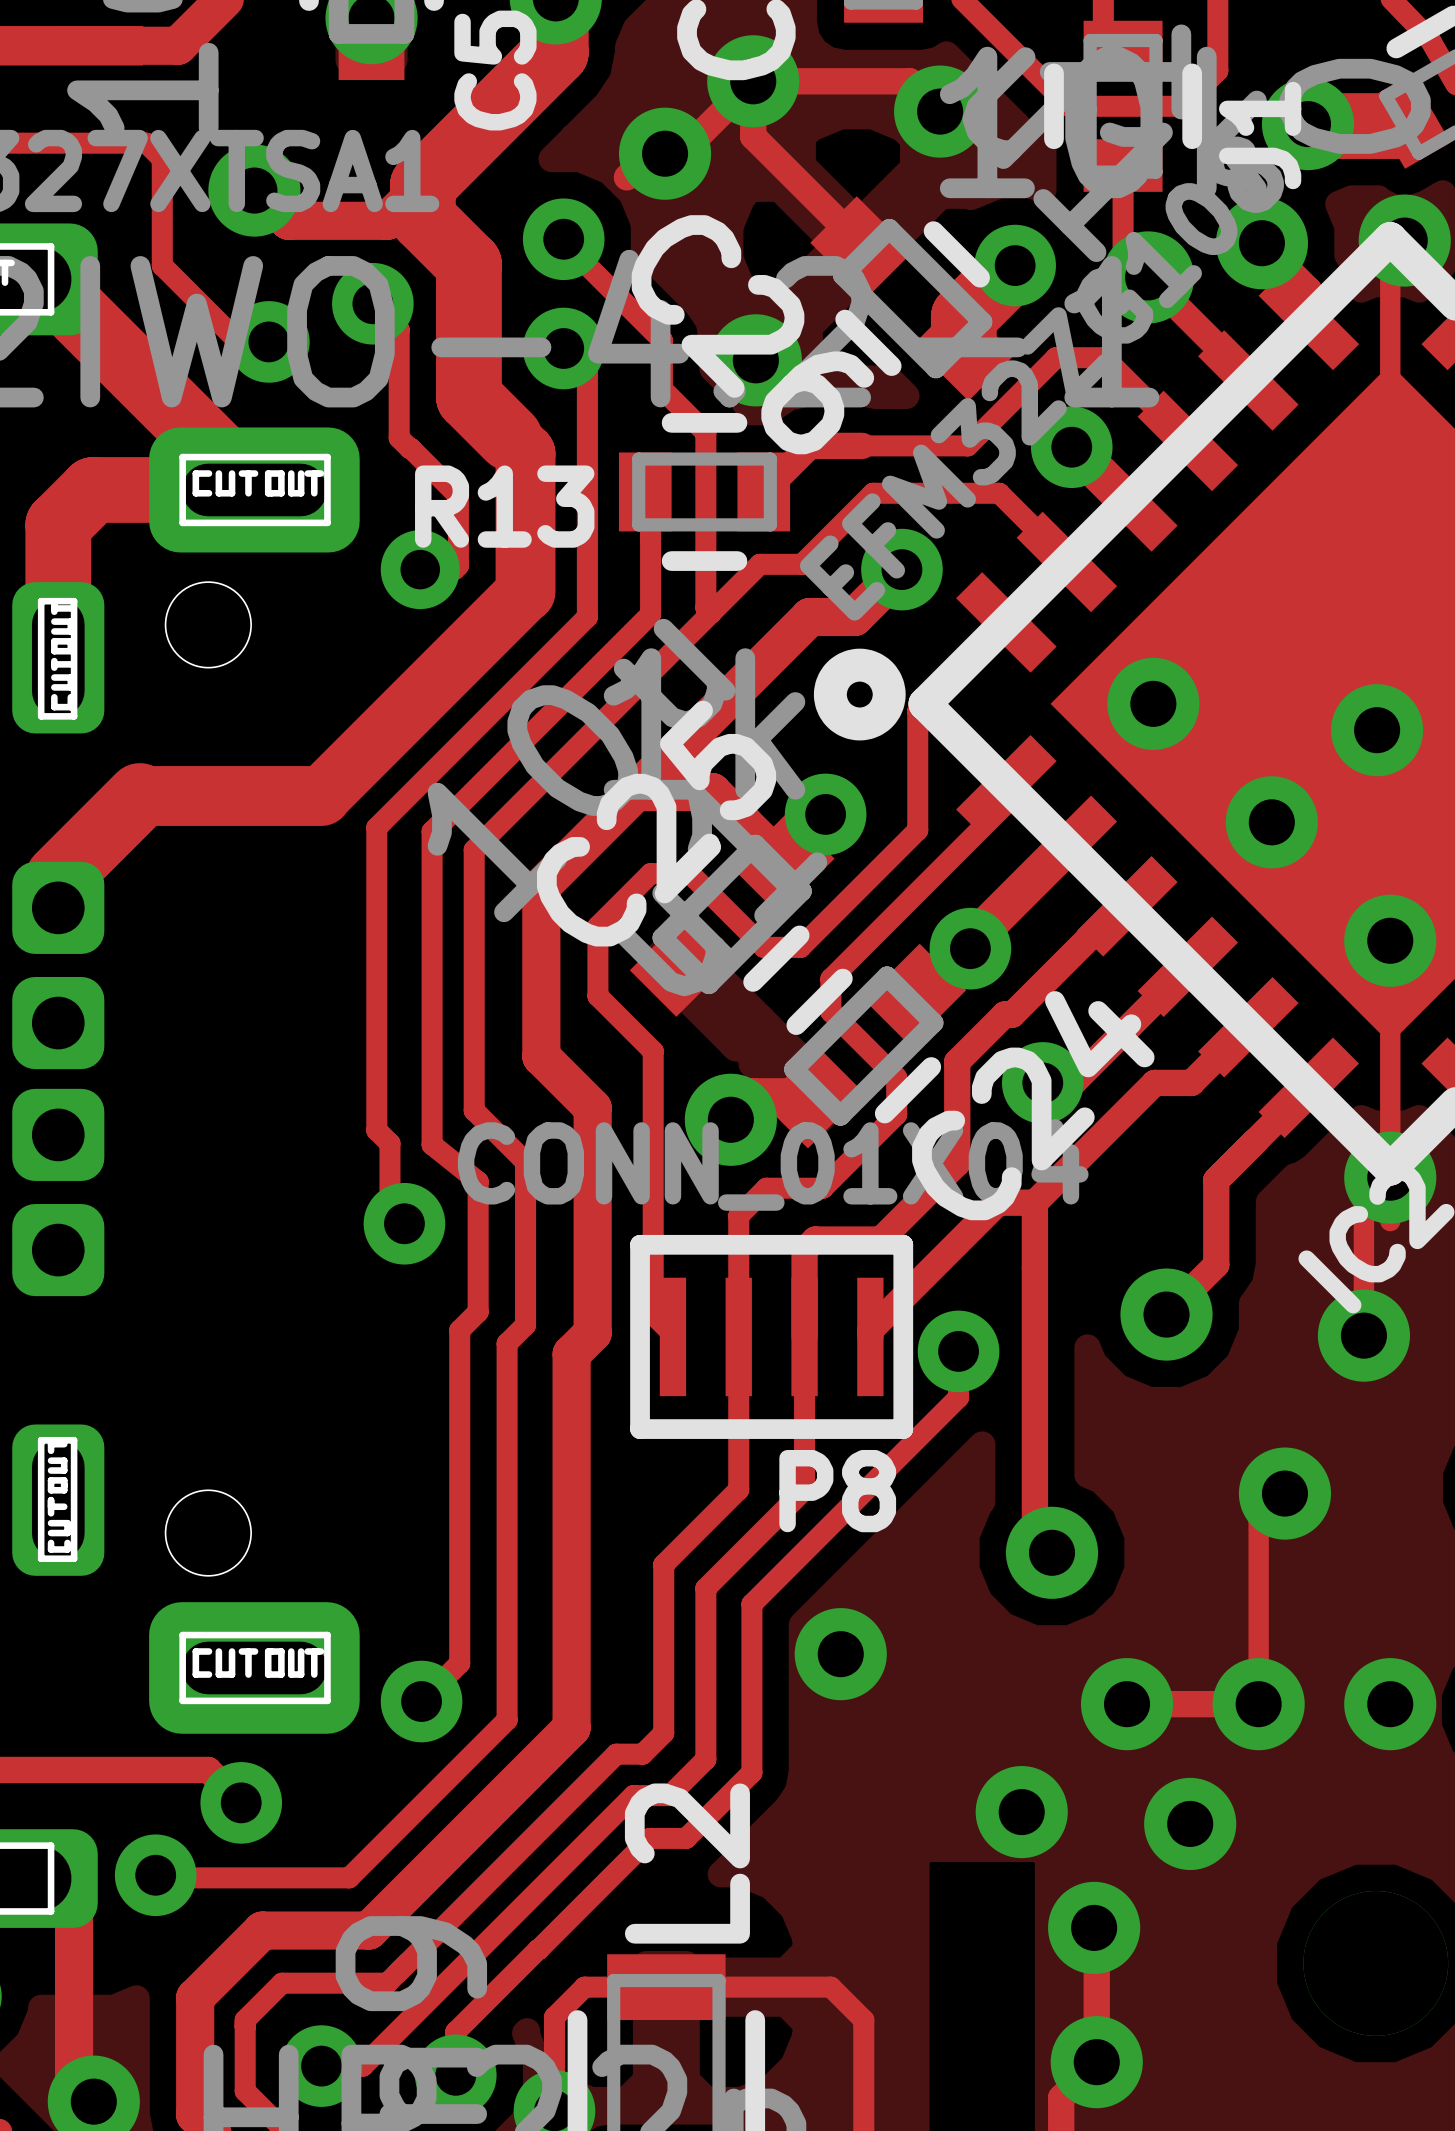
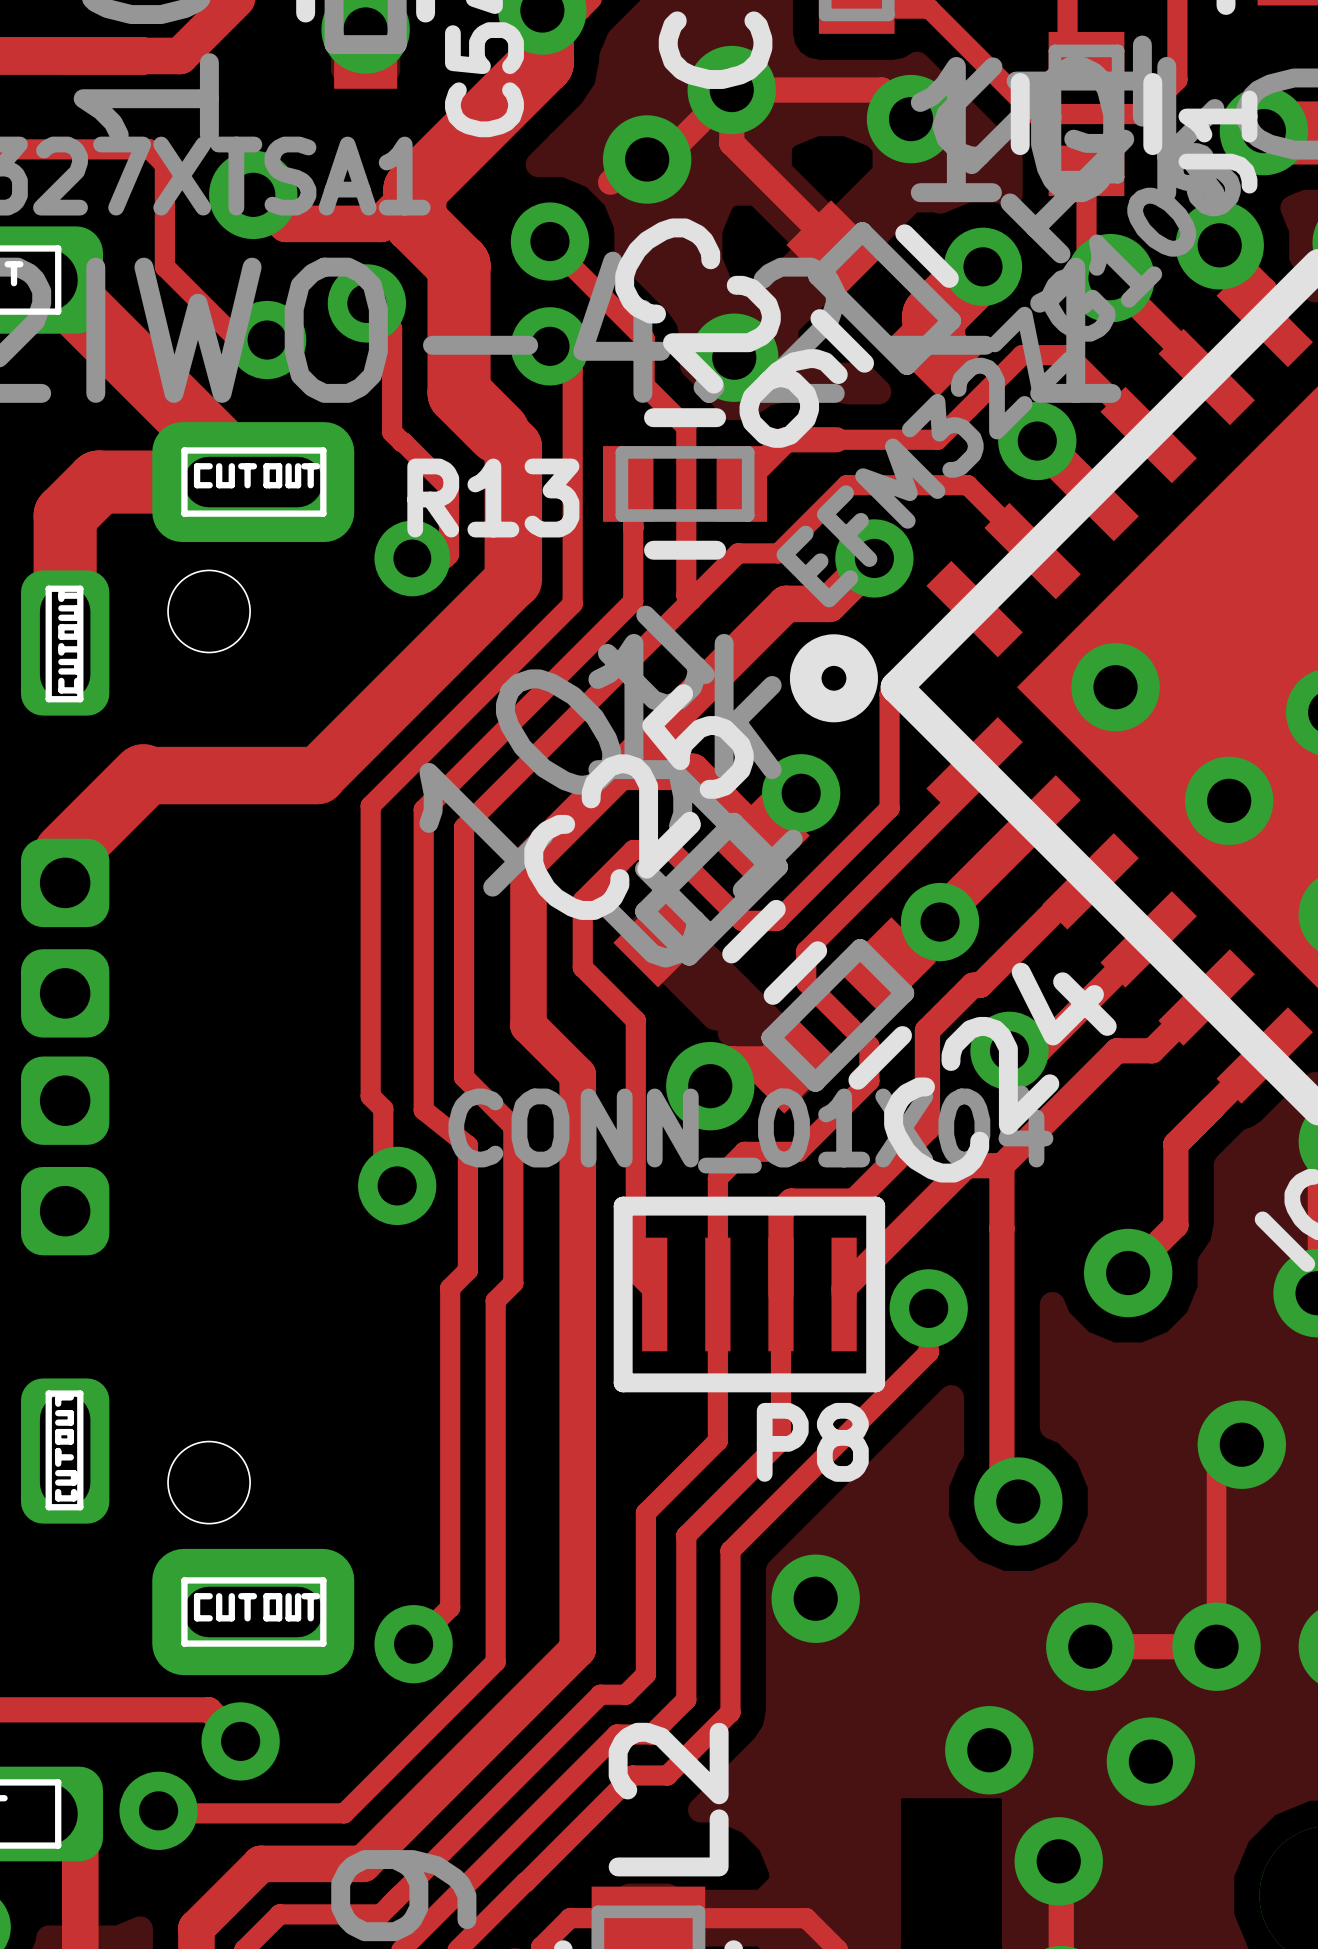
track: (592, 1332) (571, 1354) (571, 1727) -> (577, 1290) (577, 1649) (557, 1669)

